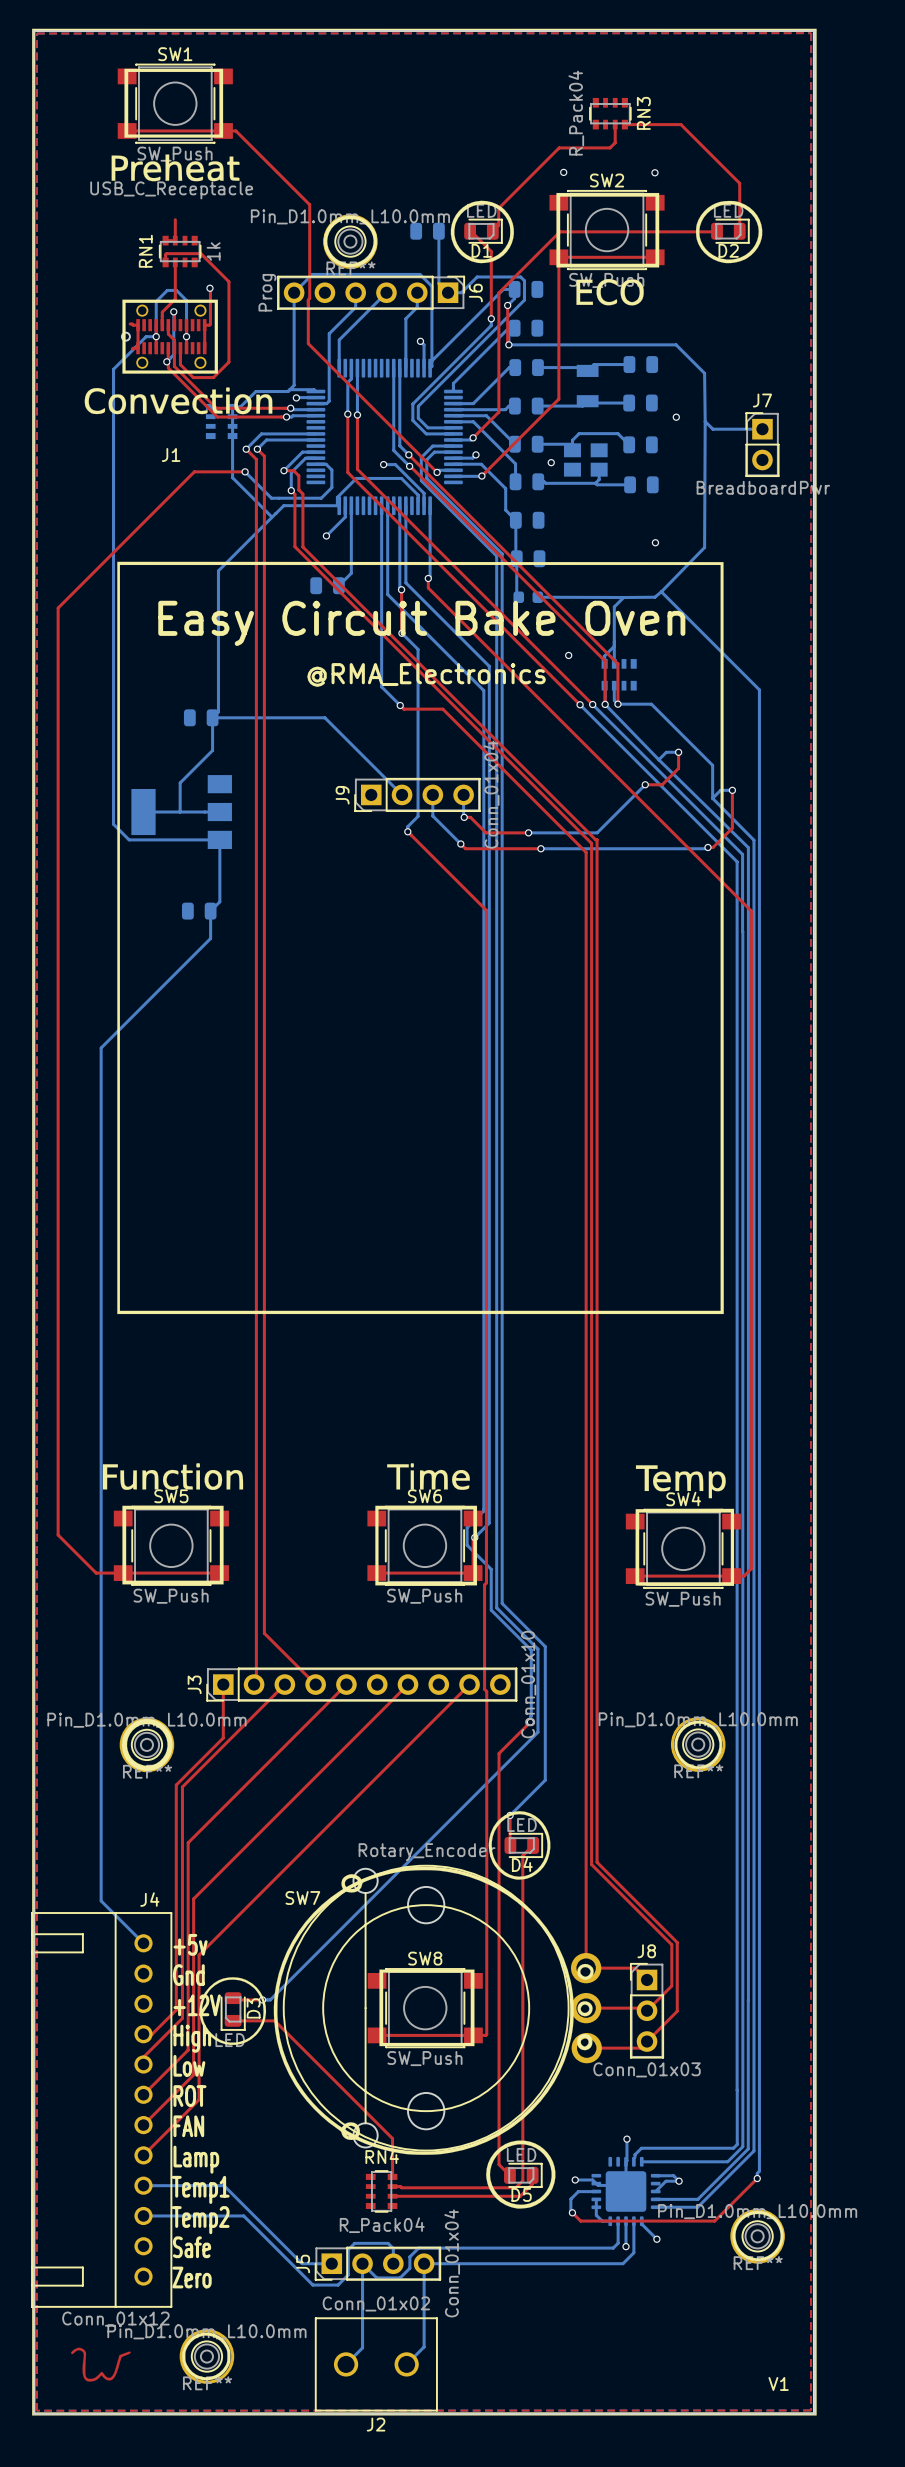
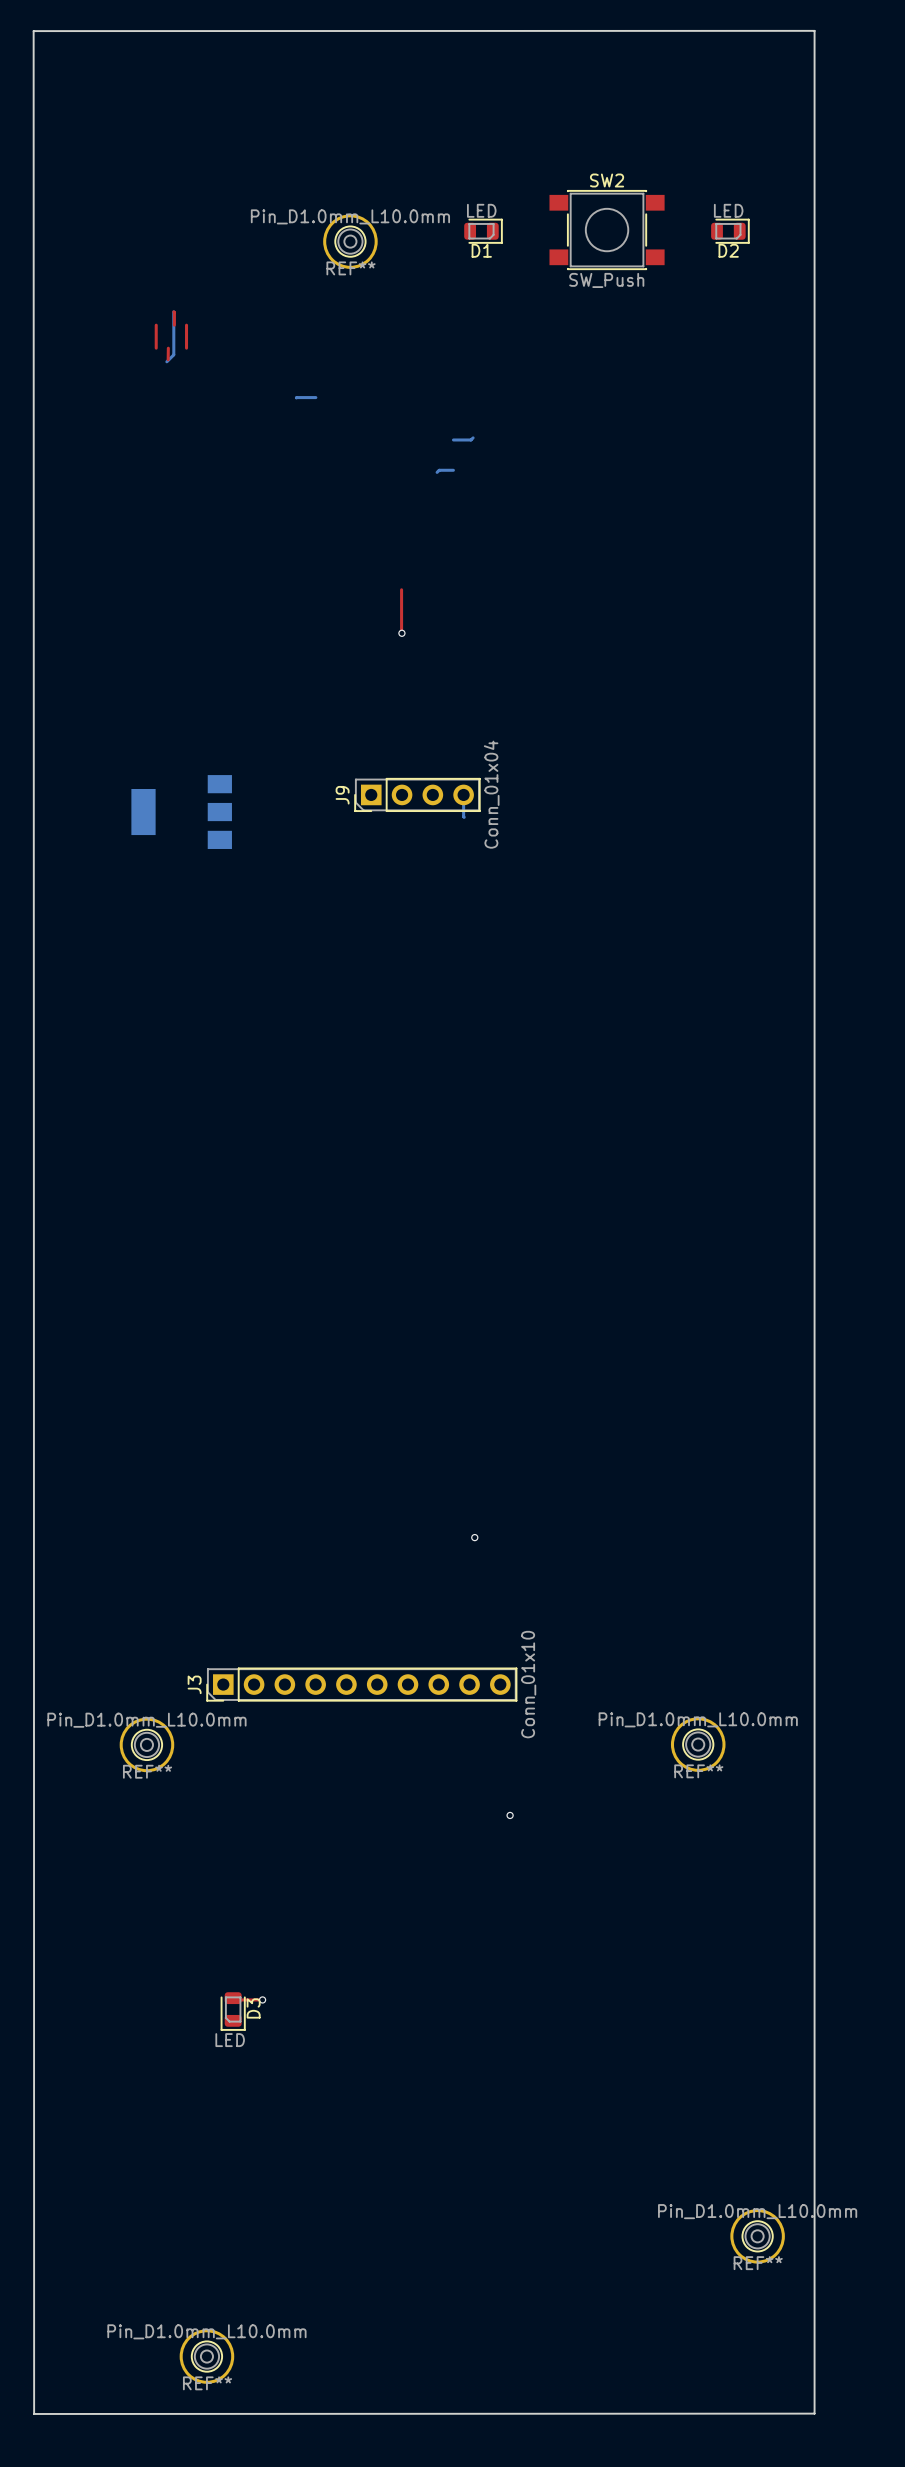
drawing: [32, 28, 817, 2416] -> none
top zone outline: (811, 33) (37, 33) (36, 2410) (810, 2410) (811, 33) -> none
SW1: SW_Push (175, 103) -> none
RN3: R_Pack04 (610, 113) -> none
top track: (615, 124) (615, 142) (610, 147) (559, 147) (498, 208) (498, 225) (492, 231) -> none
top track: (624, 124) (680, 124) (739, 183) (739, 231) -> none
top track: (127, 130) (235, 130) (309, 204) (308, 300) -> none
via: (563, 172) -> none
via: (654, 172) -> none
top track: (175, 219) (175, 240) (165, 240) -> none
part: (427, 231) -> none
bottom track: (438, 231) (438, 283) (448, 292) (461, 292) (477, 276) (520, 276) (524, 280) (524, 300) (418, 406) (418, 418) (427, 427) (453, 427) -> none
top track: (471, 231) (491, 251) (491, 318) -> none
top track: (718, 231) (559, 231) (498, 292) (498, 412) (473, 437) -> none
RN1: 1k (180, 251) -> none
top track: (655, 257) (558, 257) (558, 399) (481, 476) -> none
top track: (165, 262) (166, 253) (200, 253) (228, 281) (228, 362) (213, 377) (193, 377) (180, 364) (180, 348) -> none
top track: (175, 262) (175, 299) (162, 312) (162, 325) -> none
top track: (209, 288) (210, 324) (204, 325) (204, 348) -> none
via: (209, 288) -> none
part: (526, 289) -> none
bottom track: (355, 292) (355, 307) (329, 333) (329, 401) (326, 403) (315, 403) -> none
J6: Prog (371, 292) -> none
bottom track: (386, 292) (339, 340) (339, 368) -> none
bottom track: (417, 292) (417, 307) (405, 318) (405, 368) -> none
top track: (308, 300) (308, 343) (437, 472) -> none
bottom track: (507, 305) (514, 298) (514, 289) (503, 289) (430, 362) (430, 368) (431, 366) (431, 286) (420, 274) (312, 274) (294, 292) (294, 385) (288, 391) (255, 391) (240, 406) (232, 406) (232, 477) (271, 516) -> none
top track: (507, 305) (508, 344) -> none
via: (507, 305) -> none
via: (173, 311) -> none
bottom track: (491, 318) (491, 325) (412, 404) (412, 420) (426, 433) (453, 433) -> none
via: (491, 318) -> none
top track: (130, 324) (138, 325) (138, 348) (132, 348) -> none
top track: (168, 325) (168, 334) (174, 340) (174, 366) (216, 408) (290, 408) -> none
part: (526, 328) -> none
via: (156, 336) -> none
J1: USB_C_Receptacle (172, 336) -> none
bottom track: (186, 336) (186, 300) (176, 290) (167, 290) (156, 301) (156, 336) (146, 336) (113, 369) (113, 824) (129, 839) (219, 839) (219, 901) (210, 911) (210, 938) (101, 1047) (101, 1900) (143, 1943) -> none
via: (186, 336) -> none
bottom track: (420, 341) (424, 344) (424, 368) -> none
via: (420, 341) -> none
via: (508, 344) -> none
top track: (166, 361) (168, 359) (168, 368) (217, 417) (286, 417) -> none
via: (166, 361) -> none
bottom track: (629, 364) (594, 364) (587, 370) (584, 367) (537, 367) -> none
part: (640, 364) -> none
bottom track: (515, 367) (509, 367) (473, 403) (453, 403) -> none
part: (526, 367) -> none
bottom track: (351, 368) (351, 378) (347, 382) (347, 414) -> none
bottom track: (357, 368) (357, 415) -> none
bottom track: (393, 368) (393, 450) (409, 466) -> none
bottom track: (399, 368) (399, 445) (408, 454) -> none
part: (587, 386) -> none
bottom track: (289, 389) (314, 389) (315, 391) -> none
bottom track: (453, 391) (453, 383) (508, 328) (514, 328) (508, 333) (508, 344) (676, 344) (704, 373) (705, 421) -> none
via: (296, 397) -> none
bottom track: (629, 403) (589, 403) (587, 401) (582, 406) (537, 406) -> none
part: (640, 403) -> none
bottom track: (514, 406) (509, 406) (505, 409) (453, 409) -> none
part: (526, 406) -> none
bottom track: (290, 408) (315, 409) -> none
via: (290, 408) -> none
top track: (347, 414) (347, 472) (580, 704) -> none
via: (347, 414) -> none
bottom track: (315, 415) (286, 417) -> none
top track: (357, 415) (357, 469) (592, 704) -> none
via: (357, 415) -> none
bottom track: (453, 415) (486, 415) (514, 444) -> none
via: (286, 417) -> none
via: (676, 417) -> none
part: (221, 421) -> none
bottom track: (453, 421) (473, 421) (515, 463) (515, 481) -> none
bottom track: (705, 421) (712, 429) (762, 429) -> none
bottom track: (705, 421) (704, 547) (661, 591) -> none
bottom track: (315, 433) (261, 433) (246, 449) -> none
part: (384, 436) -> none
via: (473, 437) -> none
bottom track: (315, 439) (266, 439) (257, 449) -> none
part: (526, 444) -> none
bottom track: (537, 444) (572, 444) -> none
bottom track: (629, 444) (617, 433) (579, 433) (572, 440) (572, 450) -> none
part: (640, 444) -> none
J7: BreadboardPwr (762, 444) -> none
bottom track: (453, 446) (432, 446) (421, 457) (421, 480) (496, 556) (496, 1607) (537, 1649) (537, 1732) (270, 1999) (262, 1999) -> none
top track: (246, 449) (256, 459) (256, 1682) (254, 1684) -> none
via: (246, 449) -> none
top track: (257, 449) (264, 456) (264, 1633) (315, 1684) -> none
via: (257, 449) -> none
bottom track: (315, 452) (302, 452) (283, 470) -> none
bottom track: (453, 452) (434, 452) (426, 459) (426, 478) (502, 553) (502, 1603) (545, 1646) (545, 1780) (510, 1815) -> none
top track: (408, 454) (617, 663) (617, 704) -> none
via: (408, 454) -> none
bottom track: (475, 454) (472, 458) (453, 458) -> none
via: (475, 454) -> none
bottom track: (315, 458) (305, 458) (291, 472) (291, 490) -> none
part: (585, 459) -> none
via: (551, 462) -> none
bottom track: (315, 464) (326, 464) (331, 470) (331, 487) (321, 498) (271, 498) (245, 471) -> none
bottom track: (383, 464) (395, 464) (424, 493) (424, 505) -> none
via: (383, 464) -> none
bottom track: (453, 464) (481, 464) (505, 488) (505, 510) (515, 520) (516, 595) (518, 597) -> none
top track: (409, 466) (605, 661) (605, 704) -> none
via: (409, 466) -> none
bottom track: (599, 469) (599, 479) (595, 483) -> none
top track: (283, 470) (293, 470) (298, 475) (298, 489) (302, 494) (302, 547) (597, 839) (597, 1862) (677, 1942) (677, 2011) (640, 2048) (586, 2048) -> none
via: (283, 470) -> none
top track: (245, 471) (194, 471) (58, 608) (58, 1535) (96, 1573) (219, 1573) -> none
via: (245, 471) -> none
via: (437, 472) -> none
bottom track: (481, 476) (453, 476) -> none
via: (481, 476) -> none
part: (526, 481) -> none
bottom track: (538, 481) (595, 483) -> none
bottom track: (595, 483) (630, 484) -> none
part: (641, 484) -> none
top track: (291, 490) (294, 494) (294, 546) (591, 843) (591, 1864) (671, 1944) (671, 1985) (647, 2010) (644, 2008) (586, 2008) -> none
via: (291, 490) -> none
bottom track: (418, 501) (418, 495) (401, 478) (356, 478) (337, 497) (339, 505) (283, 505) (276, 513) -> none
bottom track: (345, 505) (345, 517) (326, 535) -> none
bottom track: (351, 505) (351, 573) (338, 585) -> none
bottom track: (381, 505) (381, 686) (400, 705) -> none
bottom track: (387, 505) (387, 594) (483, 690) (483, 1511) (467, 1527) (467, 1545) (491, 1569) (491, 1610) (531, 1650) (530, 1722) -> none
bottom track: (399, 505) (399, 588) (401, 589) -> none
bottom track: (405, 505) (405, 582) (489, 666) (489, 1523) (474, 1537) -> none
bottom track: (430, 505) (430, 576) (428, 578) -> none
bottom track: (275, 513) (218, 570) (218, 711) (212, 717) -> none
part: (527, 520) -> none
via: (326, 535) -> none
via: (655, 542) -> none
part: (528, 558) -> none
top track: (428, 578) (428, 588) (751, 911) (751, 1568) (743, 1576) (635, 1576) -> none
via: (428, 578) -> none
part: (327, 585) -> none
via: (401, 589) -> none
bottom track: (661, 591) (654, 597) (623, 597) -> none
bottom track: (661, 591) (759, 689) (759, 2171) (757, 2178) -> none
part: (528, 597) -> none
bottom track: (537, 597) (623, 597) -> none
bottom track: (623, 597) (614, 606) (614, 663) -> none
text: Easy Circuit Bake Oven (421, 623) -> none
bottom track: (401, 633) (418, 649) (418, 816) (407, 826) (407, 831) -> none
bottom track: (614, 646) (604, 656) (604, 663) -> none
via: (568, 655) -> none
text: @RMA_Electronics (426, 674) -> none
part: (619, 674) -> none
bottom track: (604, 685) (605, 704) (658, 759) -> none
bottom track: (614, 685) (614, 700) (617, 704) (651, 704) (712, 765) (712, 798) -> none
bottom track: (580, 704) (737, 861) (737, 2090) -> none
via: (580, 704) -> none
bottom track: (592, 704) (742, 854) (742, 2146) (727, 2161) (641, 2161) -> none
via: (592, 704) -> none
via: (605, 704) -> none
via: (617, 704) -> none
top track: (400, 705) (403, 709) (442, 709) (586, 852) (586, 1968) (635, 1968) (647, 1979) -> none
via: (400, 705) -> none
part: (201, 717) -> none
bottom track: (212, 717) (212, 750) (180, 782) (180, 812) -> none
bottom track: (212, 717) (324, 717) (402, 794) -> none
bottom track: (678, 752) (666, 752) (658, 759) -> none
top track: (678, 752) (678, 768) (662, 784) (645, 784) -> none
via: (678, 752) -> none
bottom track: (658, 759) (748, 847) (748, 2000) -> none
bottom track: (645, 784) (597, 832) (528, 832) -> none
via: (645, 784) -> none
bottom track: (732, 790) (720, 790) (712, 798) -> none
top track: (732, 790) (732, 828) (713, 847) (707, 847) -> none
via: (732, 790) -> none
bottom track: (432, 794) (432, 816) (460, 844) -> none
bottom track: (712, 798) (753, 840) (753, 2150) (697, 2207) (655, 2207) -> none
bottom track: (143, 812) (219, 812) -> none
top track: (464, 817) (470, 817) (486, 832) (528, 832) -> none
via: (464, 817) -> none
top track: (407, 831) (486, 910) (486, 1583) (484, 1584) (484, 1689) (486, 1691) (486, 2034) (377, 2035) -> none
via: (407, 831) -> none
via: (528, 832) -> none
top track: (460, 844) (465, 848) (540, 848) -> none
via: (460, 844) -> none
bottom track: (707, 847) (540, 848) -> none
via: (707, 847) -> none
via: (540, 848) -> none
part: (199, 911) -> none
top track: (474, 1537) (473, 1539) (473, 1573) (376, 1573) -> none
SW5: SW_Push (171, 1545) -> none
SW6: SW_Push (424, 1545) -> none
SW4: SW_Push (683, 1548) -> none
top track: (223, 1684) (223, 1738) (176, 1785) (176, 2010) (152, 2034) (143, 2034) -> none
top track: (284, 1684) (182, 1786) (182, 2018) (143, 2057) (143, 2064) -> none
top track: (346, 1684) (188, 1842) (188, 2050) (143, 2094) -> none
top track: (407, 1684) (193, 1898) (193, 2074) (143, 2125) -> none
top track: (469, 1684) (199, 1955) (199, 2099) (143, 2155) -> none
top track: (530, 1722) (499, 1753) (499, 2164) (509, 2175) -> none
via: (530, 1722) -> none
top track: (510, 1815) (508, 1845) -> none
D4: LED (523, 1845) -> none
top track: (533, 1845) (522, 1855) (522, 2180) (515, 2187) (392, 2186) -> none
text: +5v (190, 1944) -> none
text: Gnd (188, 1975) -> none
bottom track: (748, 2000) (748, 2148) (697, 2199) (655, 2199) -> none
text: +12V (197, 2005) -> none
SW8: SW_Push (425, 2008) -> none
SW7: Rotary_Encoder (442, 2008) -> none
J8: Conn_01x03 (647, 2010) -> none
top track: (233, 2020) (274, 2020) (392, 2138) (392, 2176) -> none
text: High (192, 2038) -> none
text: Low (189, 2065) -> none
bottom track: (737, 2090) (737, 2144) (733, 2148) (641, 2148) (634, 2154) (634, 2157) -> none
text: ROT (189, 2096) -> none
J4: Conn_01x12 (101, 2109) -> none
text: FAN (188, 2126) -> none
bottom track: (626, 2139) (626, 2191) (619, 2185) (598, 2185) (592, 2179) (575, 2179) -> none
via: (626, 2139) -> none
text: Lamp (196, 2159) -> none
D5: LED (523, 2175) -> none
top track: (532, 2175) (532, 2183) (520, 2196) (392, 2196) -> none
bottom track: (655, 2175) (673, 2175) (679, 2181) (666, 2181) (655, 2191) -> none
top track: (757, 2178) (714, 2221) (580, 2221) (572, 2212) -> none
via: (757, 2178) -> none
via: (575, 2179) -> none
via: (679, 2181) -> none
bottom track: (143, 2185) (224, 2185) (302, 2263) (331, 2263) -> none
text: Temp1 (200, 2189) -> none
RN4: R_Pack04 (381, 2191) -> none
bottom track: (596, 2191) (578, 2191) (570, 2199) (572, 2212) -> none
part: (626, 2191) -> none
bottom track: (596, 2199) (596, 2215) (602, 2221) (610, 2221) -> none
via: (572, 2212) -> none
bottom track: (143, 2215) (243, 2215) (312, 2285) (338, 2285) (348, 2274) (348, 2249) (354, 2243) (388, 2243) (393, 2248) (393, 2263) -> none
text: Temp2 (200, 2220) -> none
bottom track: (618, 2221) (618, 2243) (613, 2248) (418, 2248) (409, 2256) (409, 2268) (400, 2277) (376, 2277) (362, 2263) (362, 2347) (346, 2364) -> none
bottom track: (626, 2221) (626, 2246) -> none
bottom track: (633, 2221) (633, 2252) (622, 2263) (424, 2263) (424, 2346) (406, 2364) -> none
bottom track: (641, 2221) (641, 2224) (656, 2239) -> none
via: (656, 2239) -> none
via: (626, 2246) -> none
text: Safe (192, 2247) -> none
J5: Conn_01x04 (377, 2263) -> none
text: Zero (192, 2277) -> none
J2: Conn_01x02 (376, 2364) -> none
text: V1 (778, 2383) -> none

